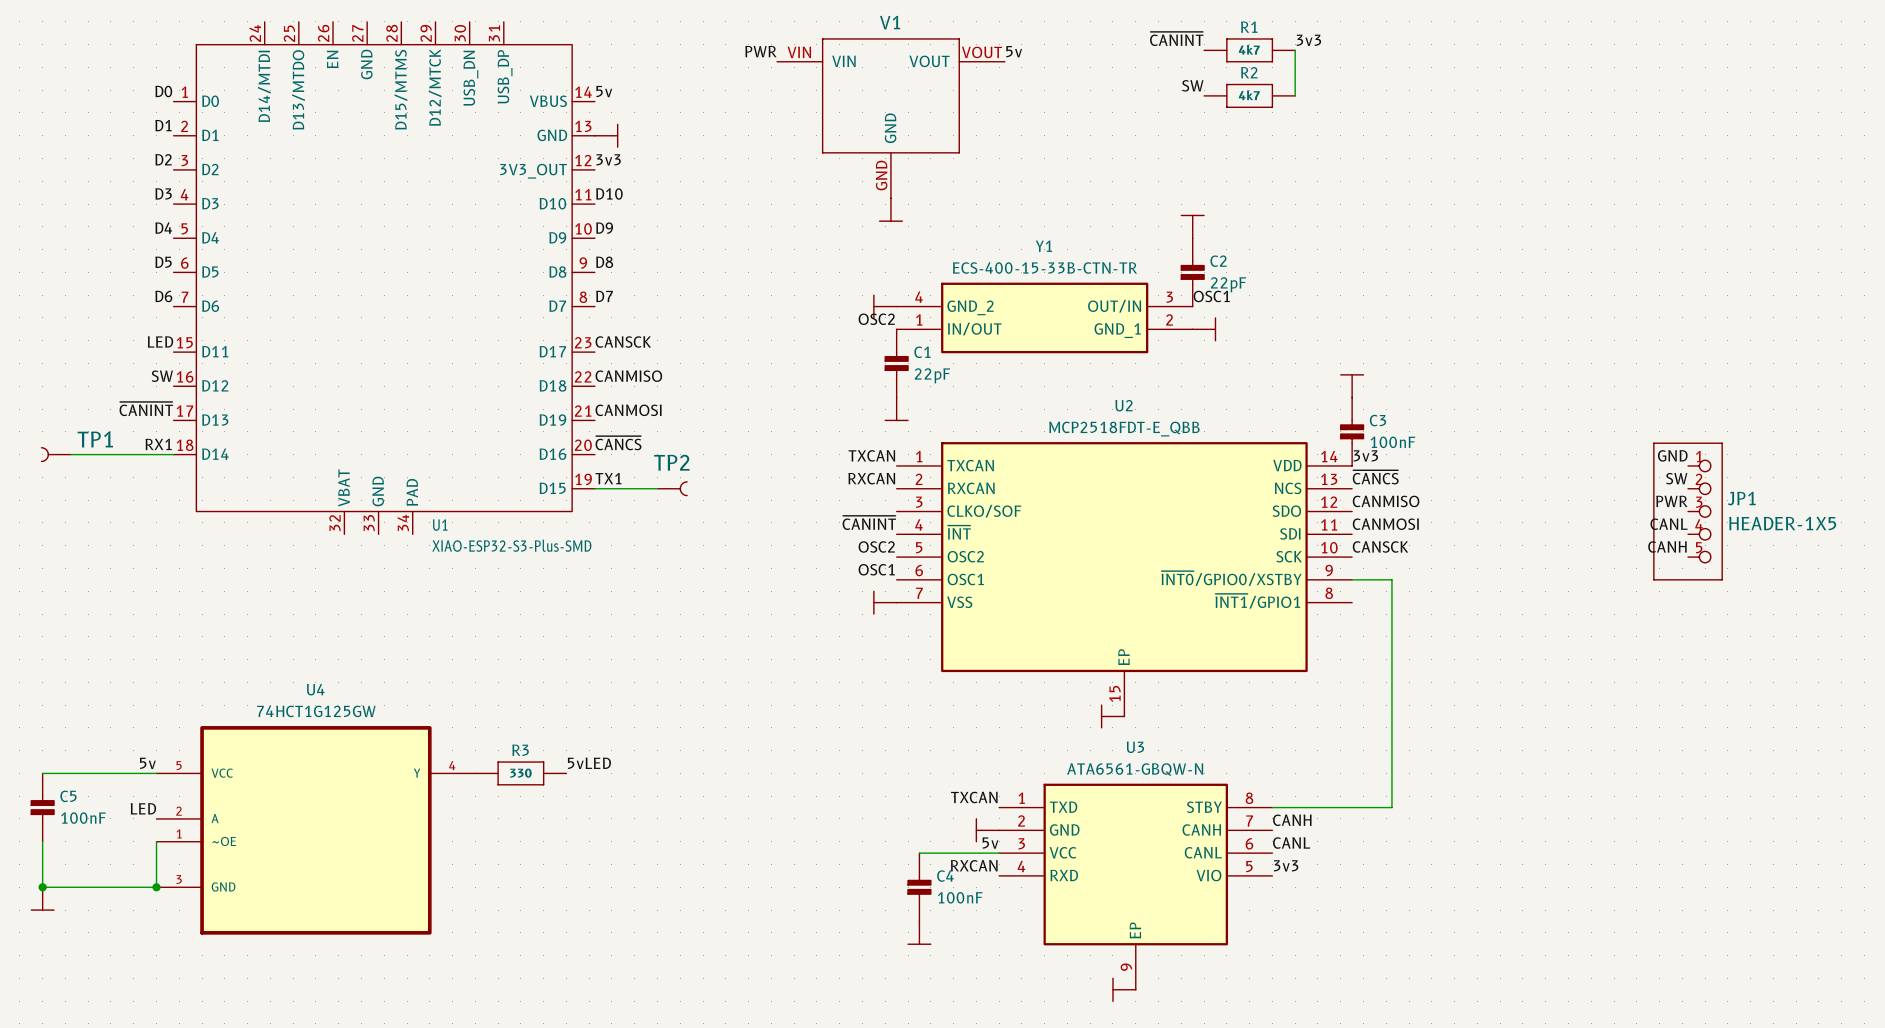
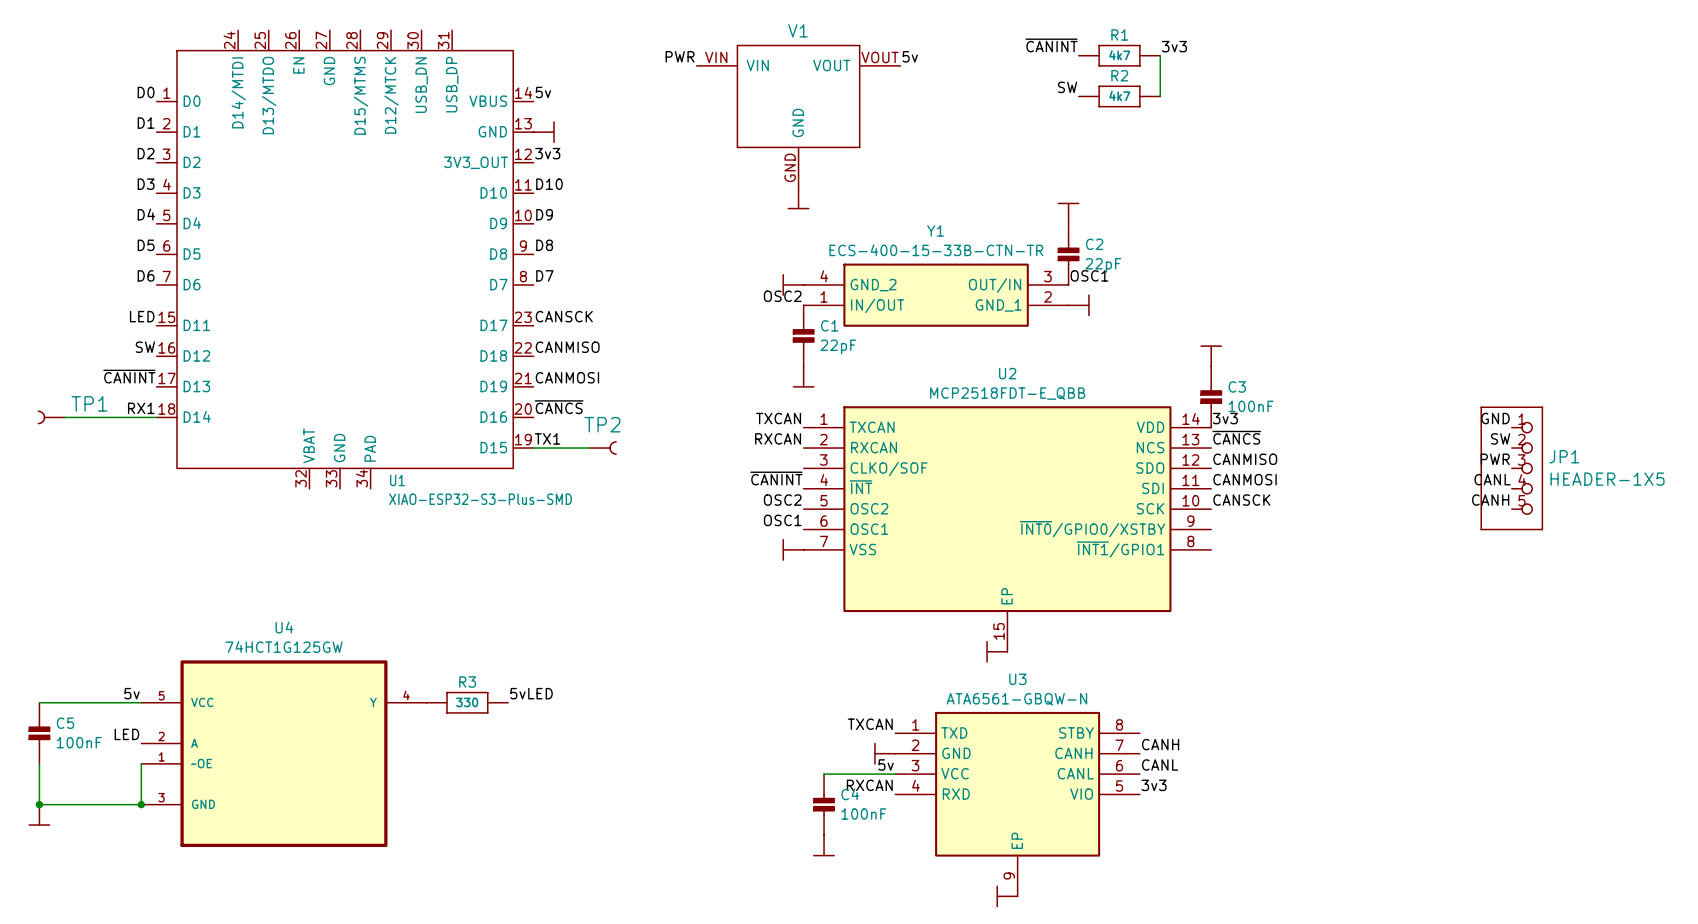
wire: (1352, 579) (1391, 579) (1391, 807) (1272, 807) -> none

